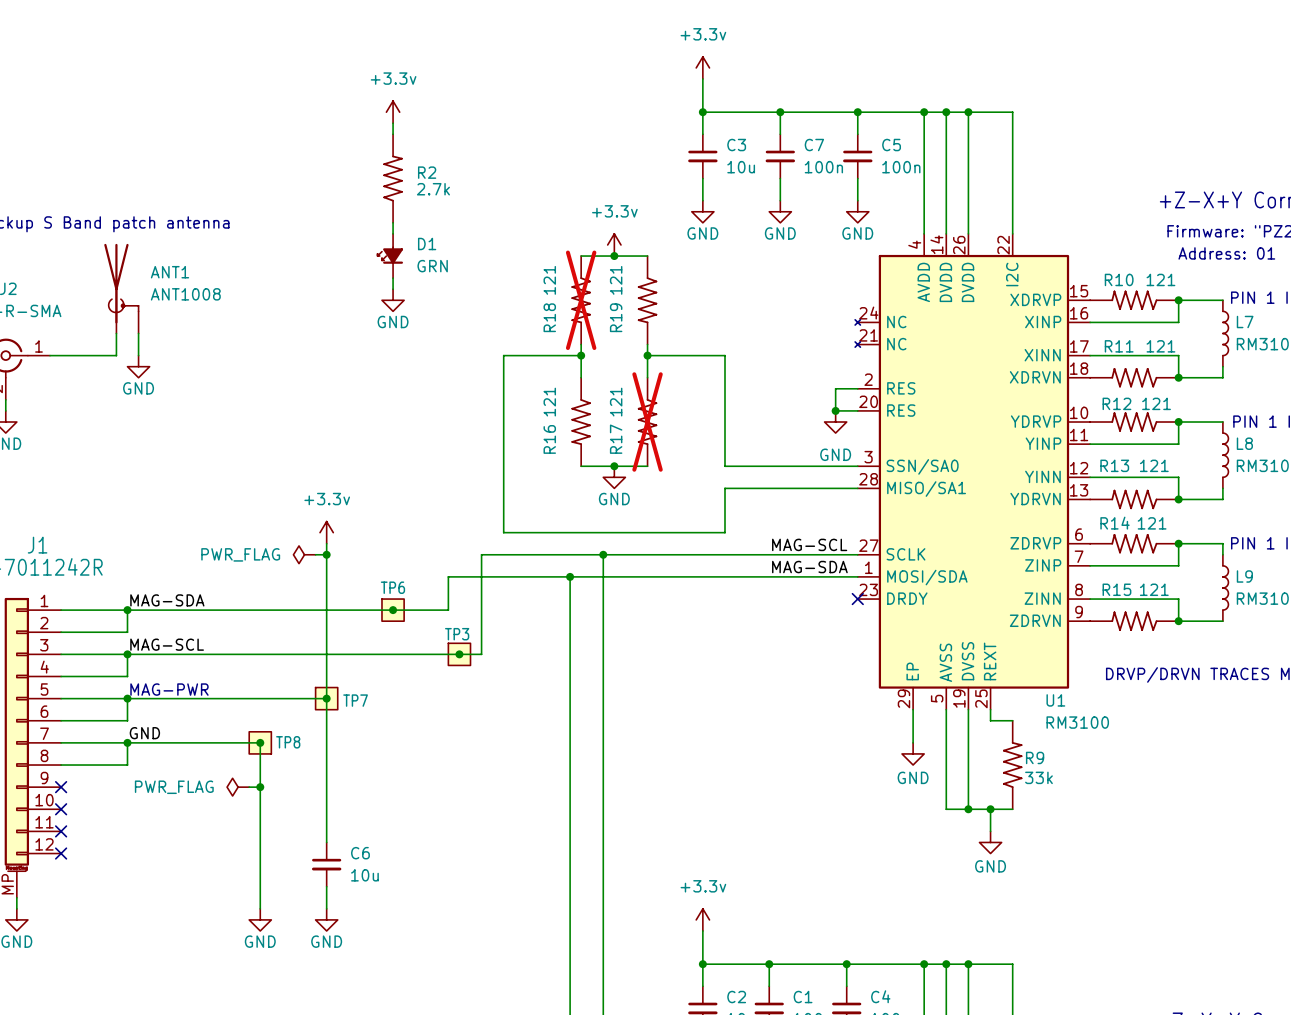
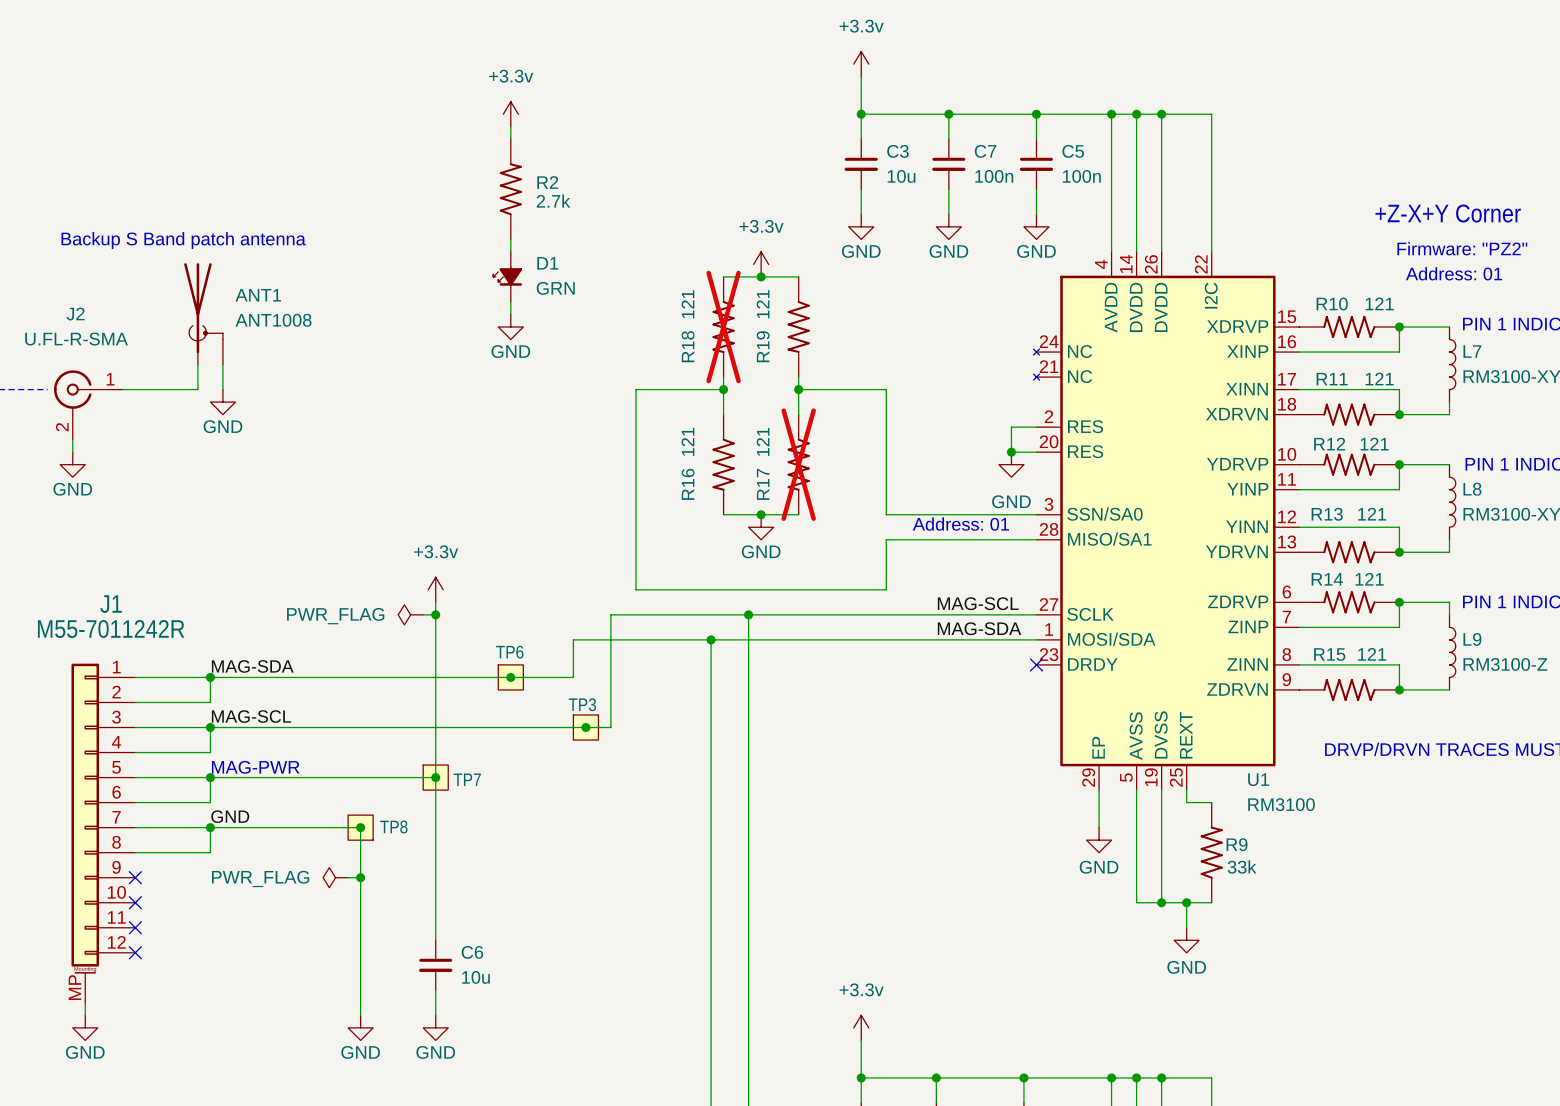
text: none -> Address: 01 (960, 524)

